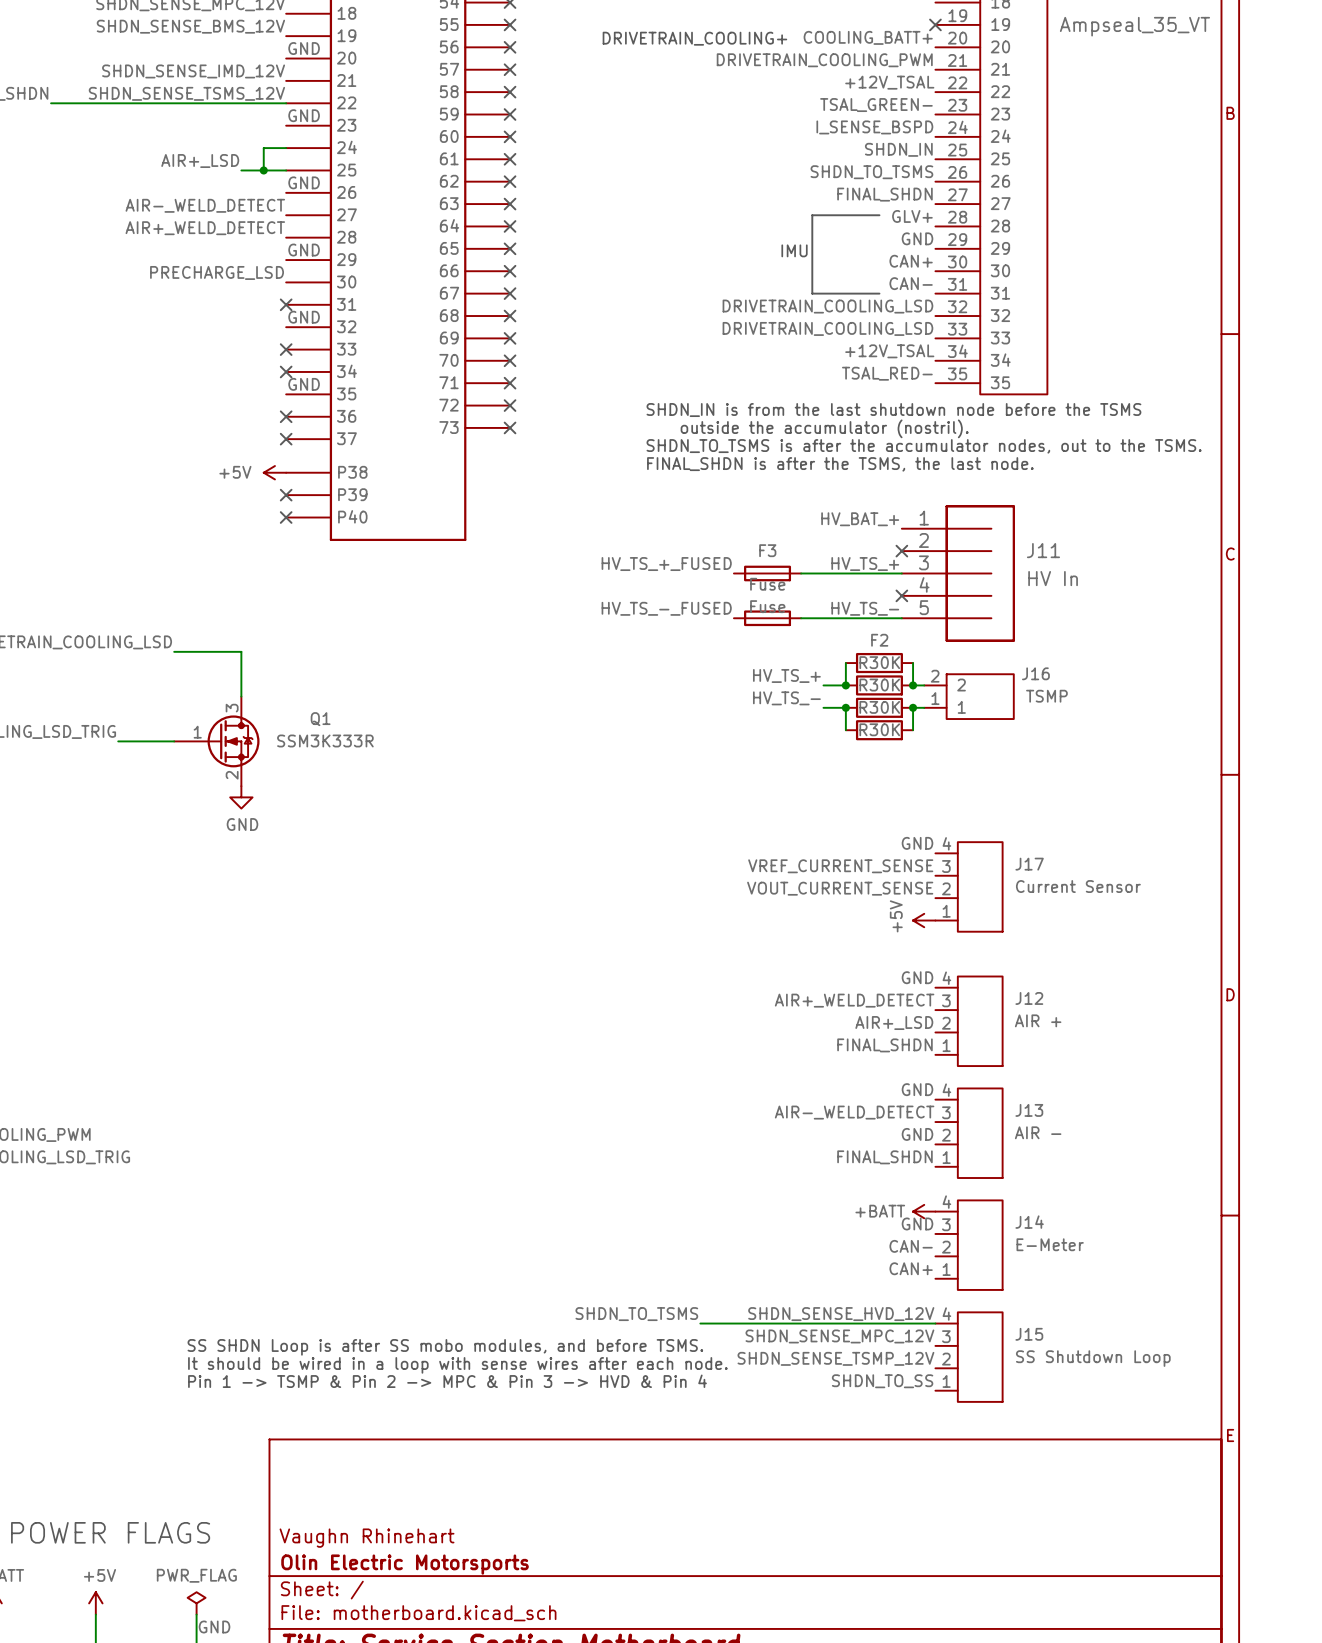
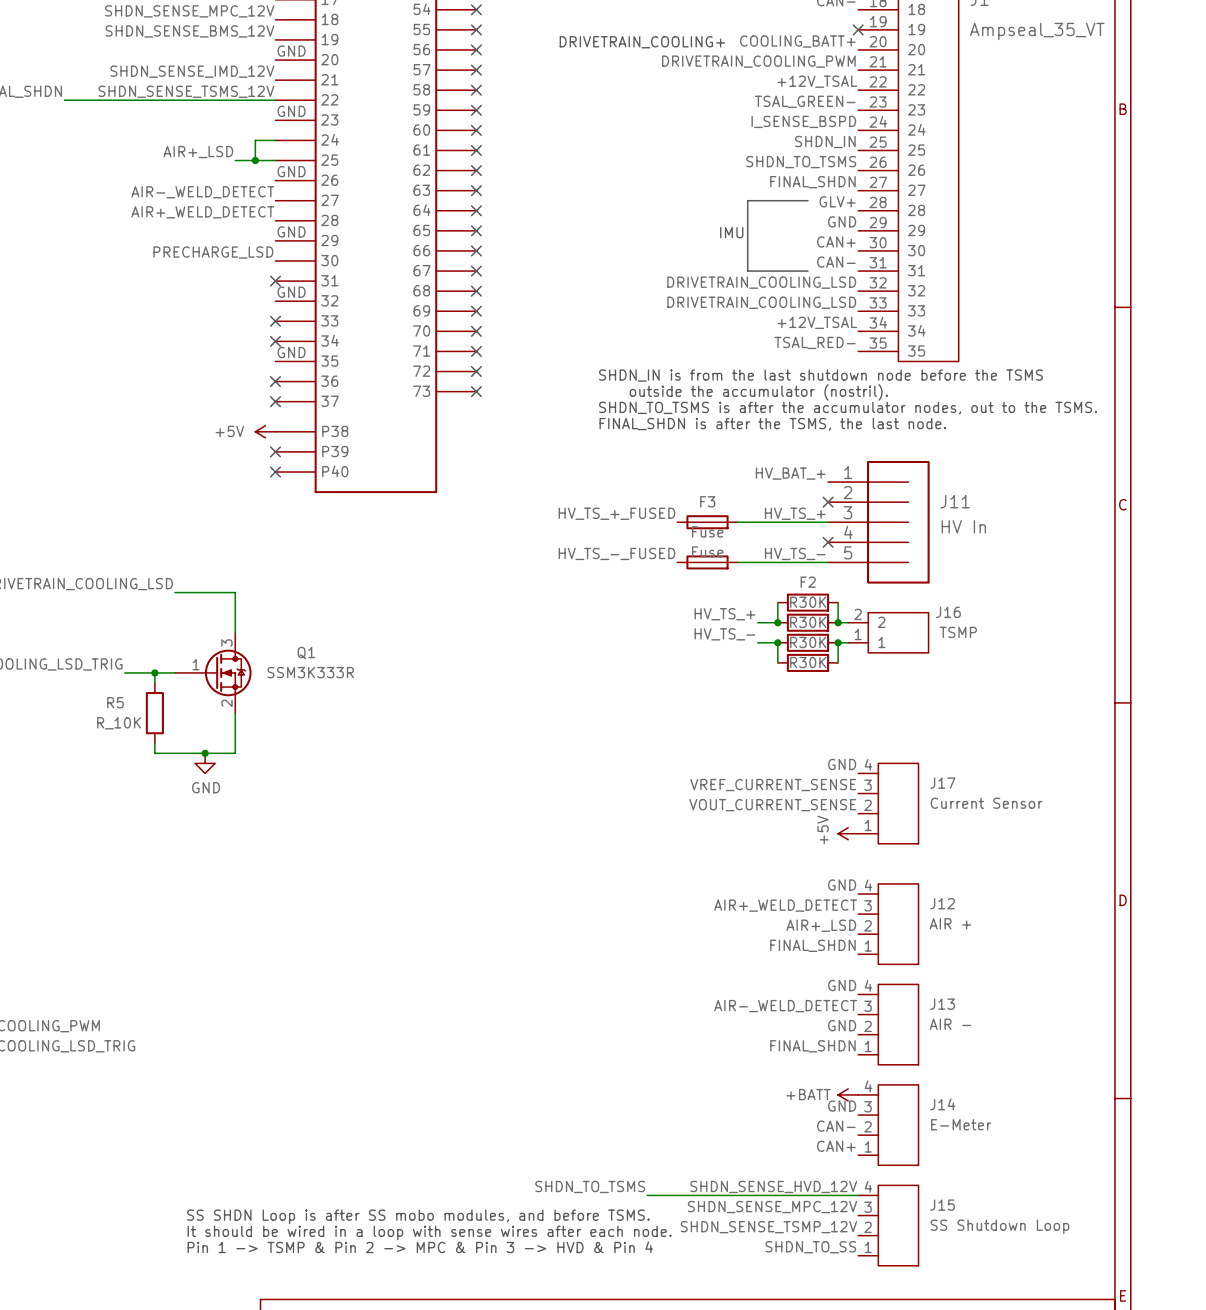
wire: none -> (154, 672) (154, 683)
junction: none -> (154, 672)
R5: none -> R_10K (154, 713)
wire: none -> (235, 713) (235, 753) (154, 753) (154, 743)
power symbol position: GND (241, 797) -> GND (205, 763)
junction: none -> (205, 753)

